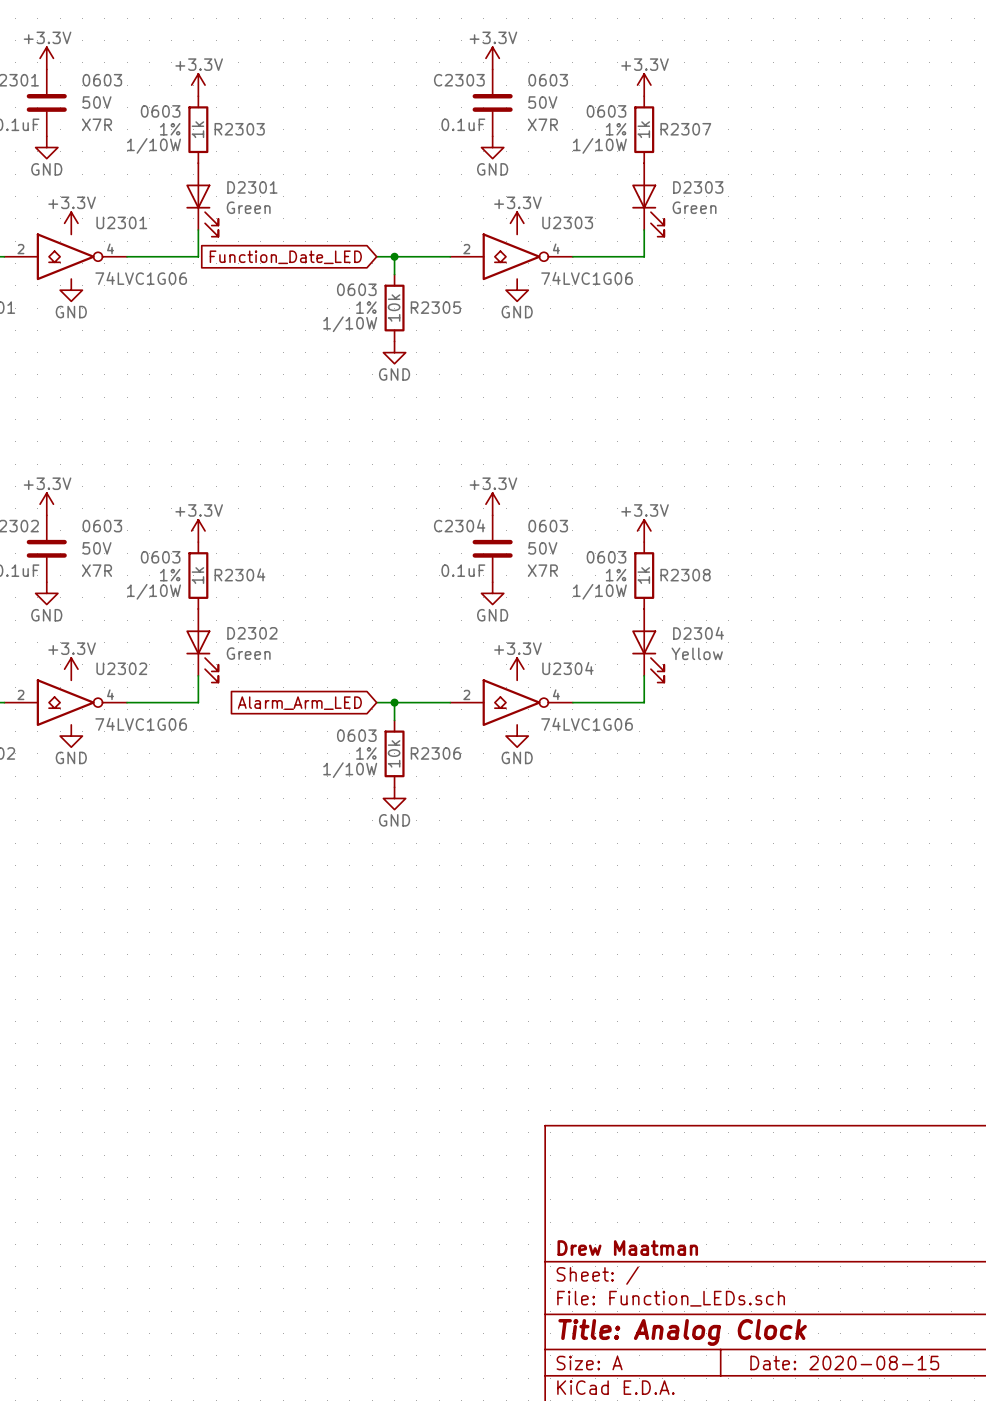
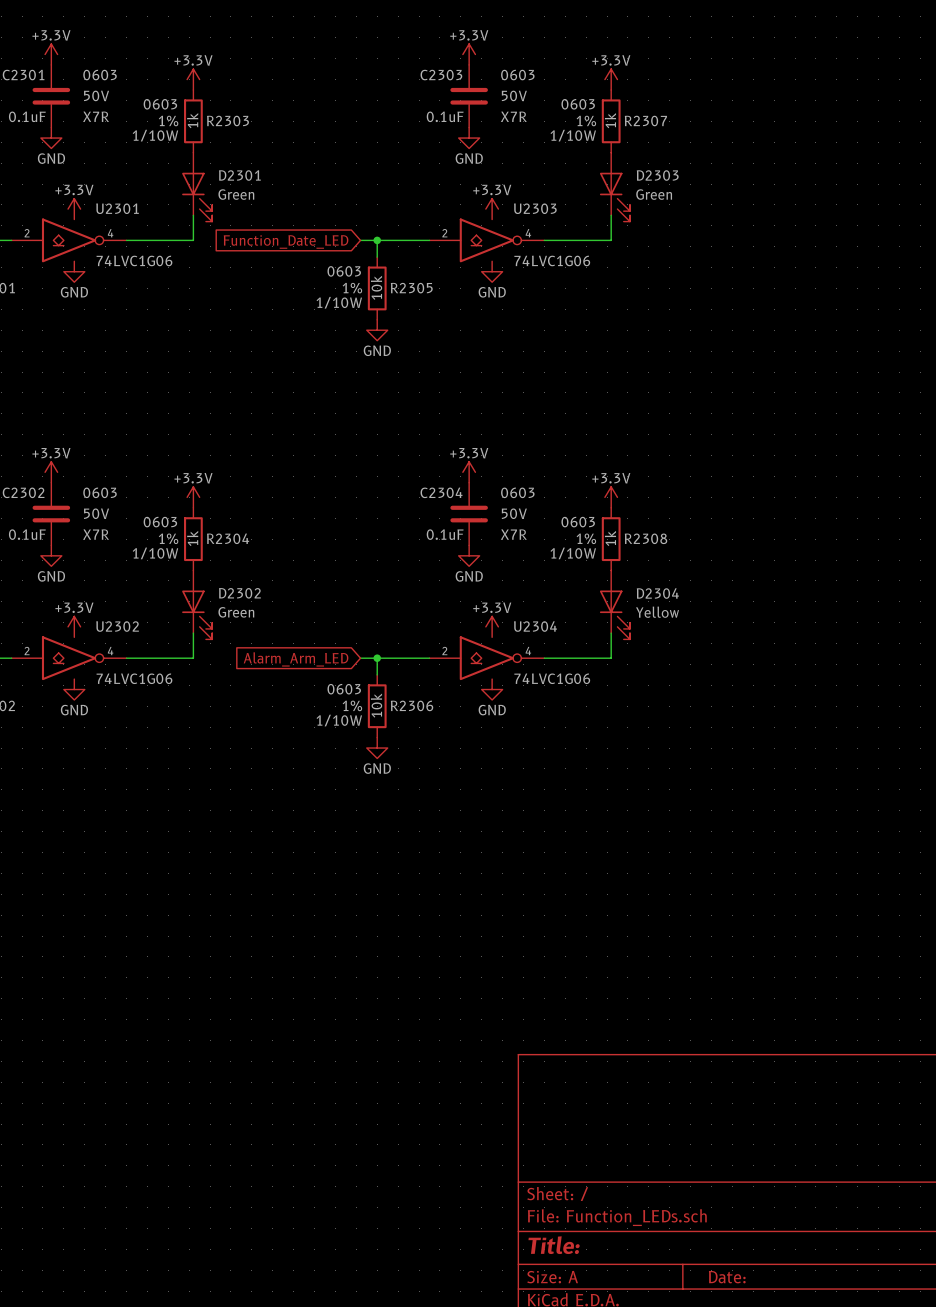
title block: Drew Maatman (627, 1248) -> none
title block: Title: Analog Clock (682, 1332) -> Title: (554, 1245)
title block: Date: 2020-08-15 (844, 1363) -> Date: (727, 1277)

